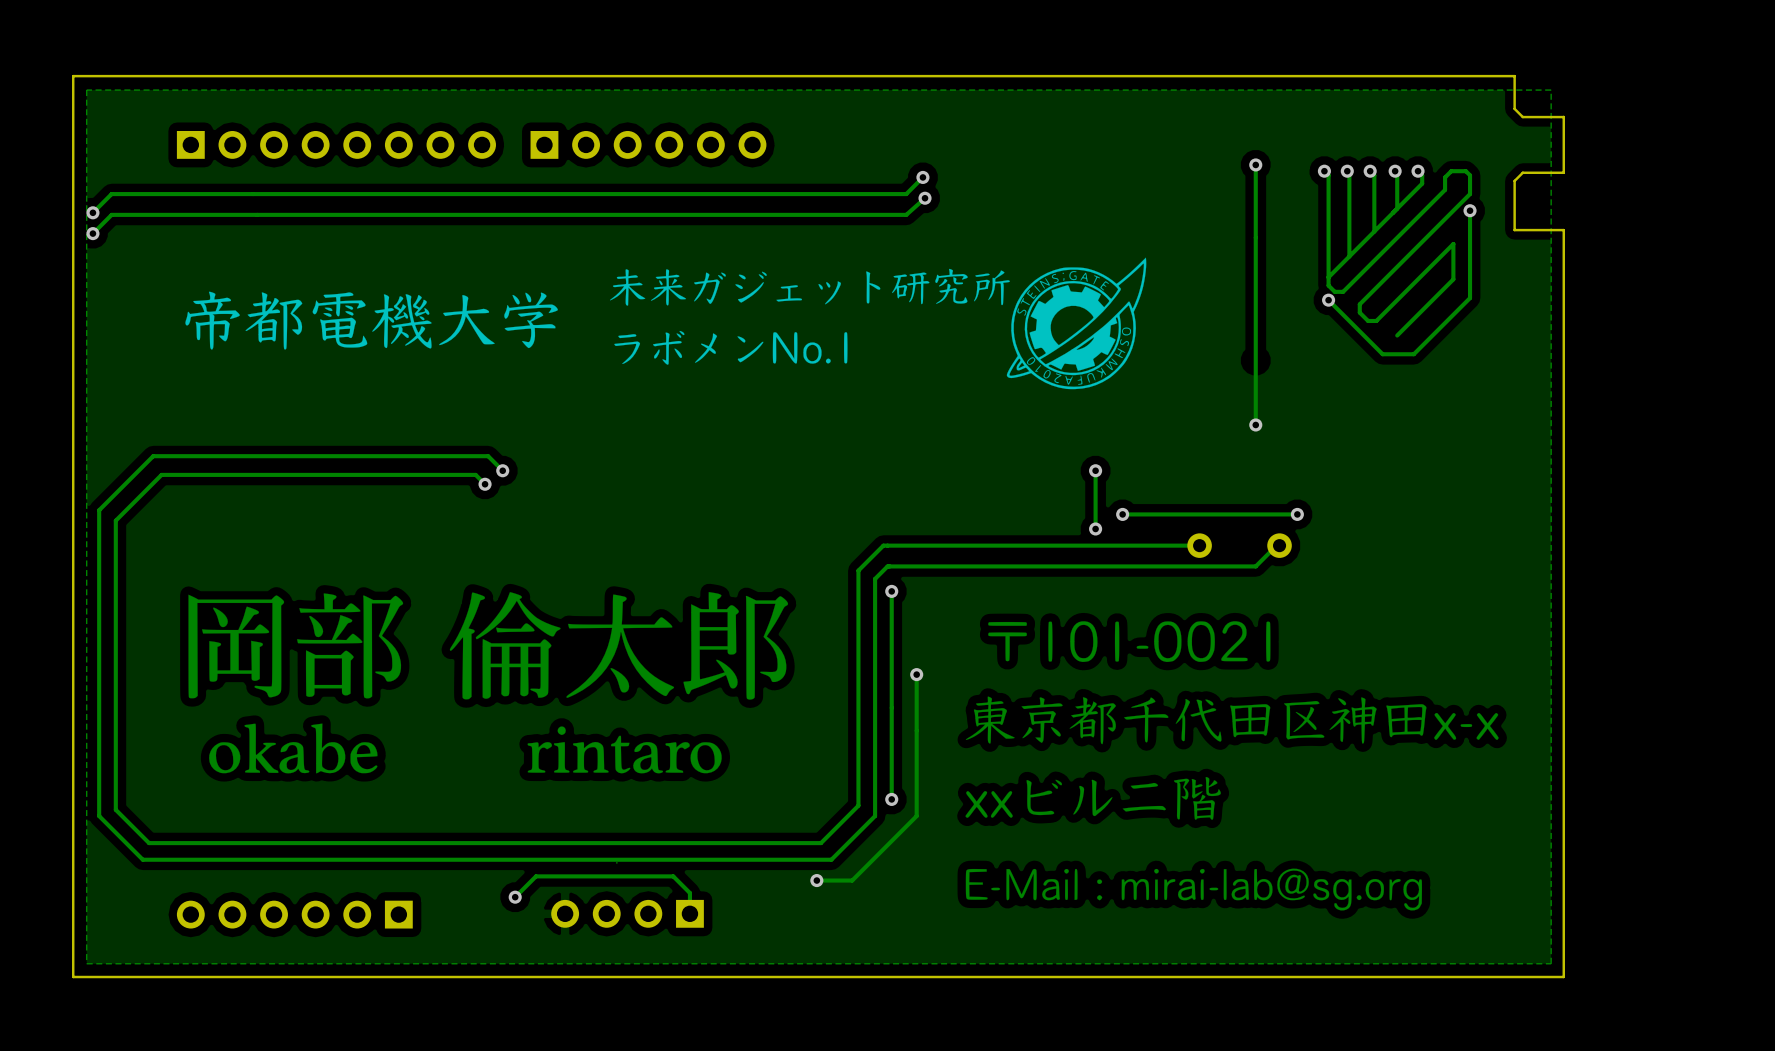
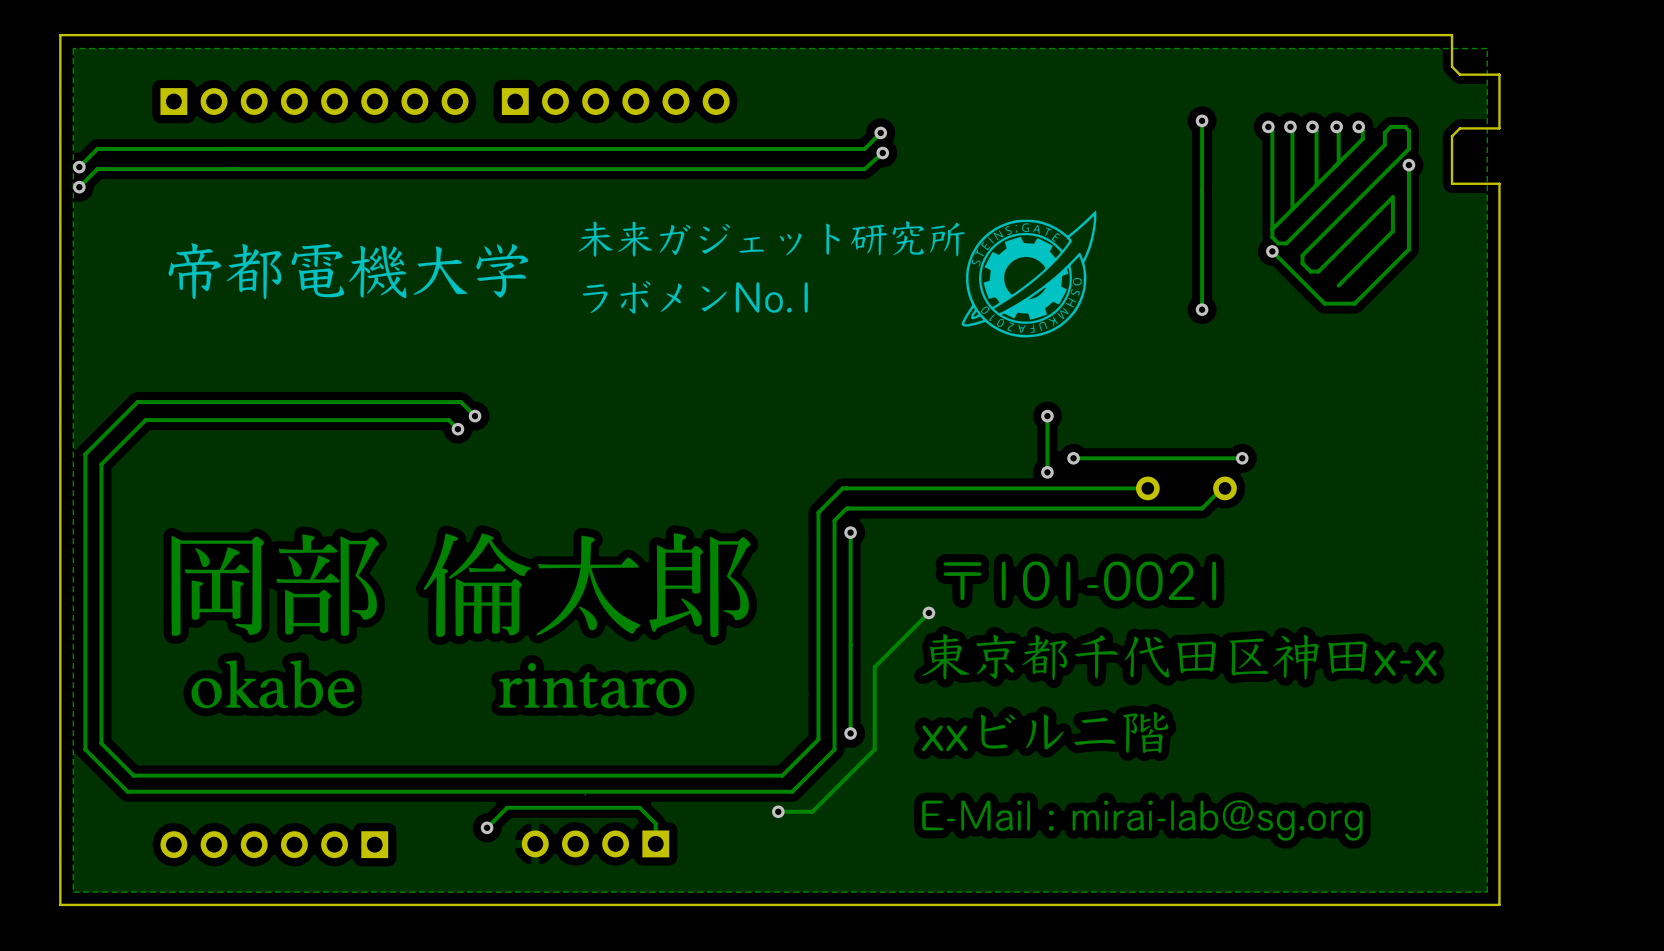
track: (1255, 360) (1255, 424) -> none
via position: (1255, 424) -> (1202, 309)
track: (916, 674) (916, 730) -> (928, 612) (874, 667)
via position: (916, 674) -> (928, 612)

